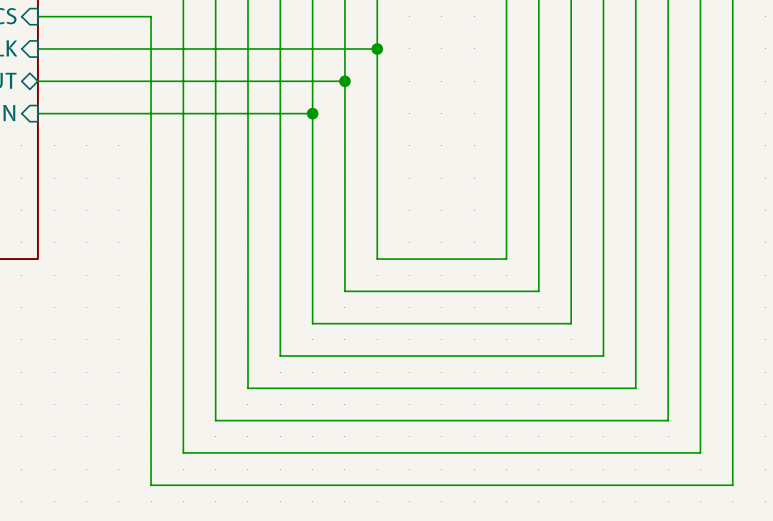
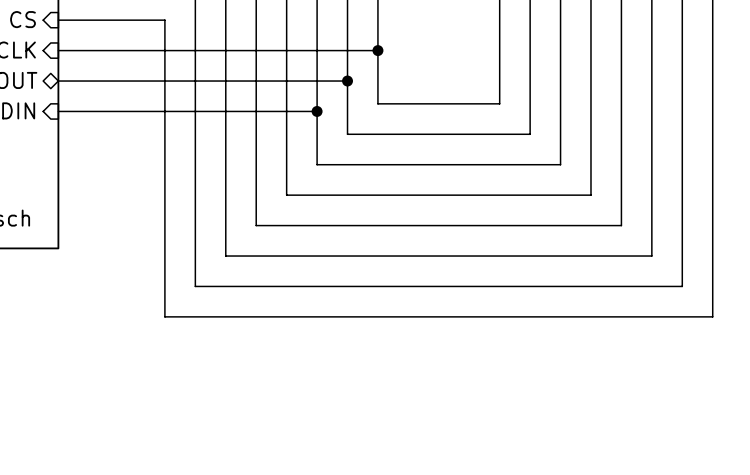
wire: (377, 105) (377, 259) (506, 259) (506, 105) -> (377, 103) (499, 103)
wire: (344, 137) (344, 291) (538, 291) (538, 137) -> (347, 134) (530, 134)
wire: (312, 170) (312, 323) (571, 323) (571, 170) -> (317, 164) (560, 164)
wire: (280, 202) (280, 355) (603, 355) (603, 202) -> (286, 195) (590, 195)
wire: (247, 234) (247, 388) (635, 388) (635, 234) -> (256, 225) (621, 225)
wire: (215, 267) (215, 420) (668, 420) (668, 267) -> (225, 256) (651, 256)
wire: (183, 299) (183, 452) (700, 452) (700, 299) -> (195, 286) (682, 286)
wire: (151, 331) (151, 485) (732, 485) (732, 331) -> (164, 316) (712, 316)

